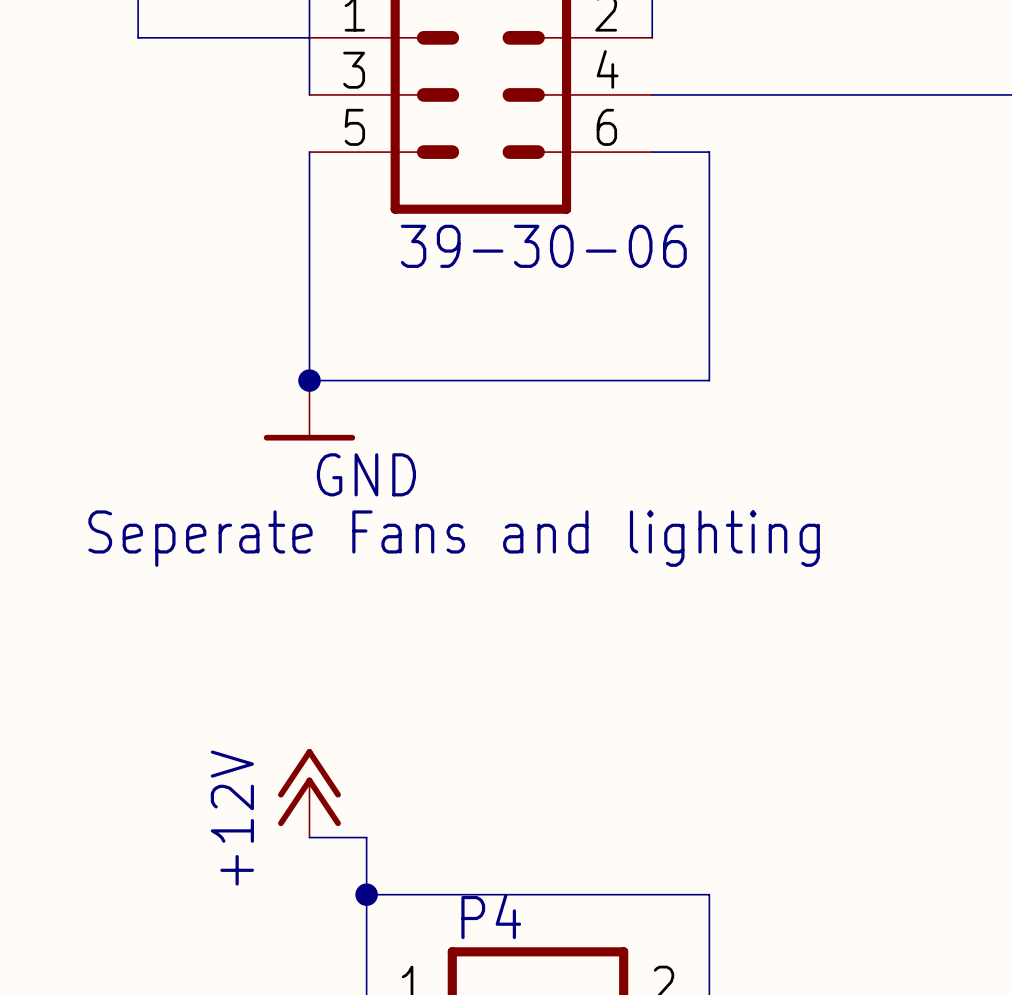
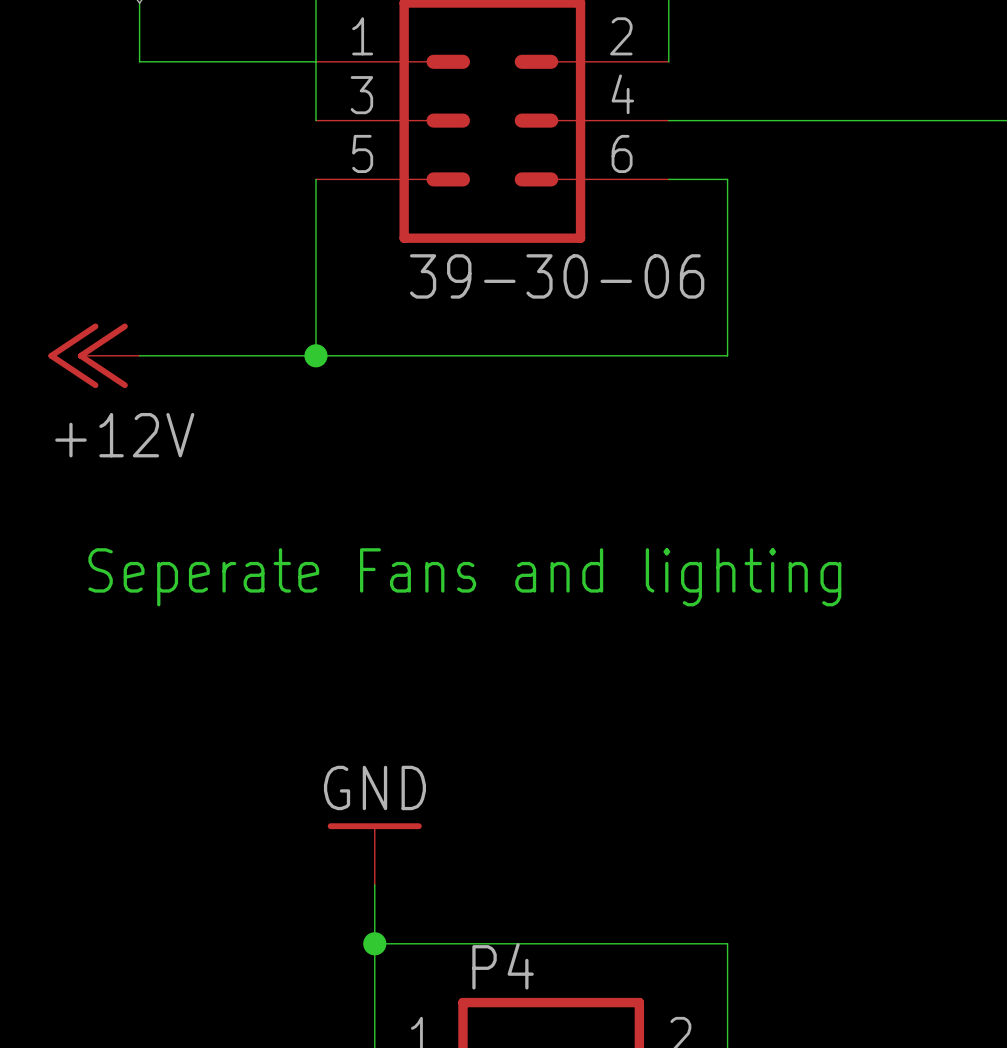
wire: (309, 323) (309, 380) (709, 380) (709, 323) -> (139, 355) (727, 355)
junction position: (309, 380) -> (315, 355)
power symbol position: GND (309, 410) -> GND (374, 854)
power symbol rotation: 0° (309, 437) -> 180° (374, 826)
power symbol text position: GND (366, 474) -> GND (374, 787)
power symbol rotation: 0° (309, 787) -> 90° counterclockwise (88, 355)
power symbol position: +12V (309, 793) -> +12V (94, 355)
wire: (309, 837) (366, 837) -> none

